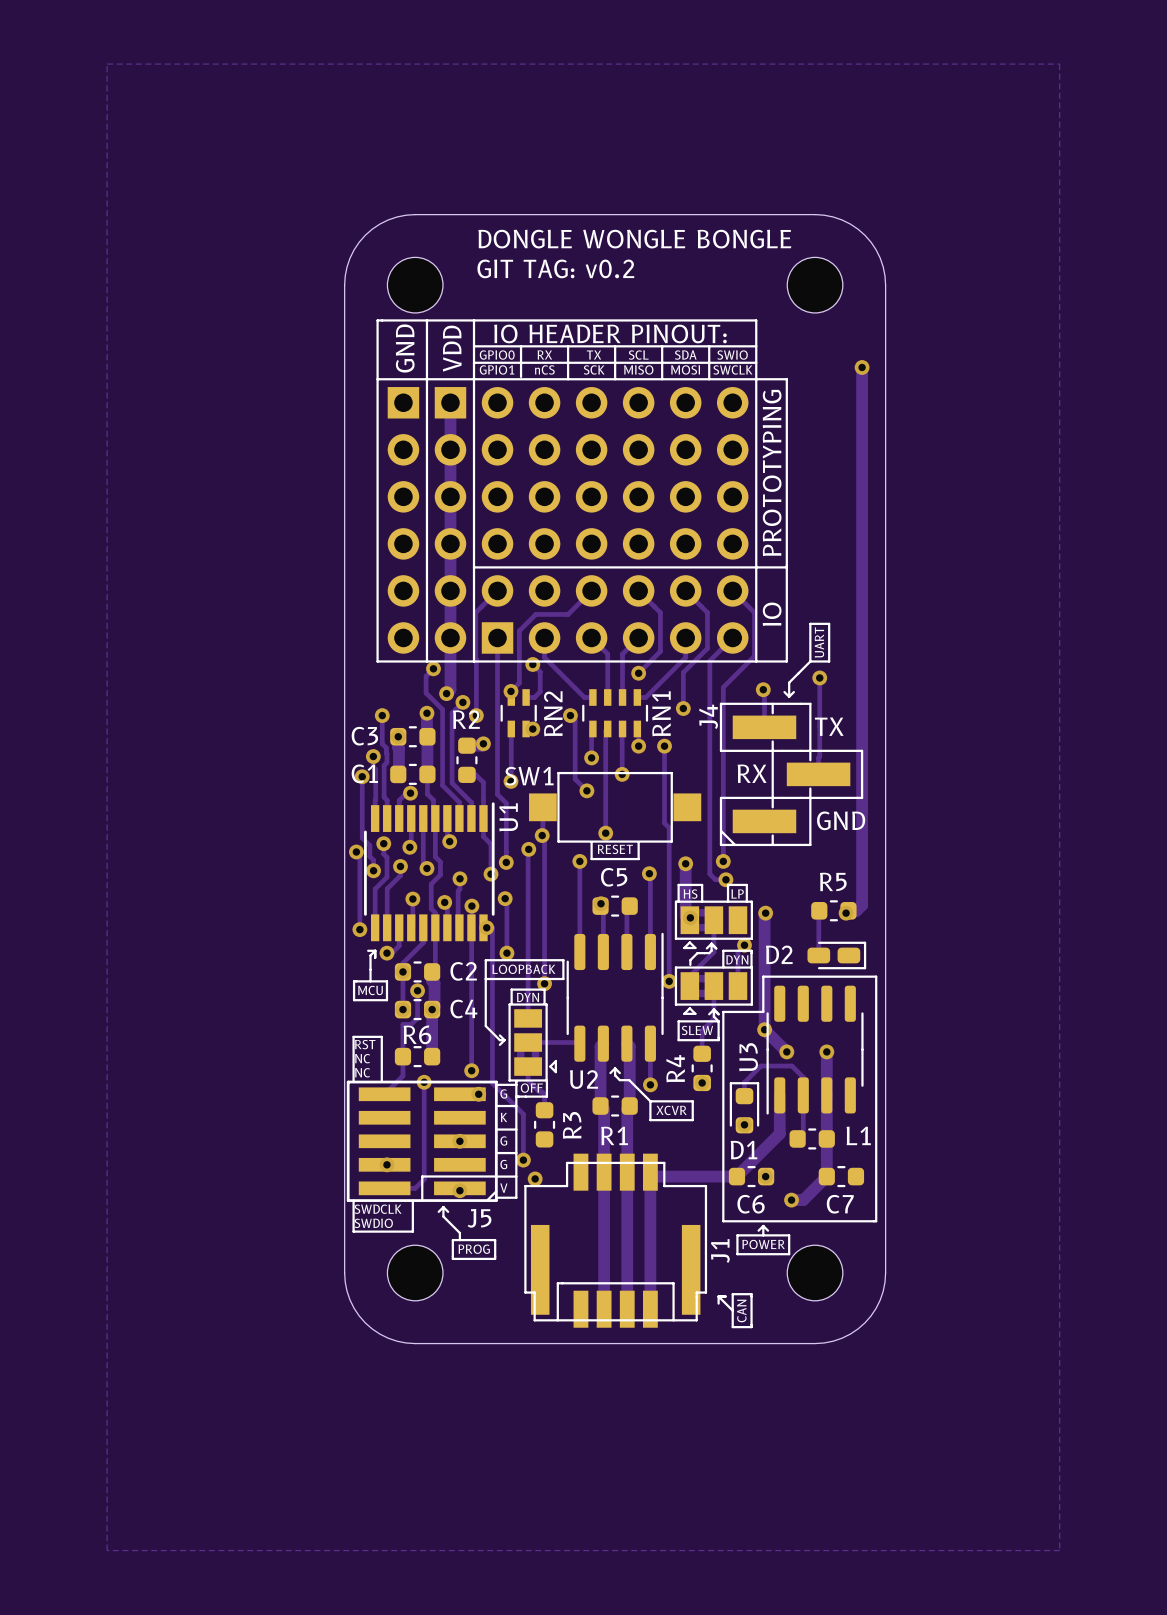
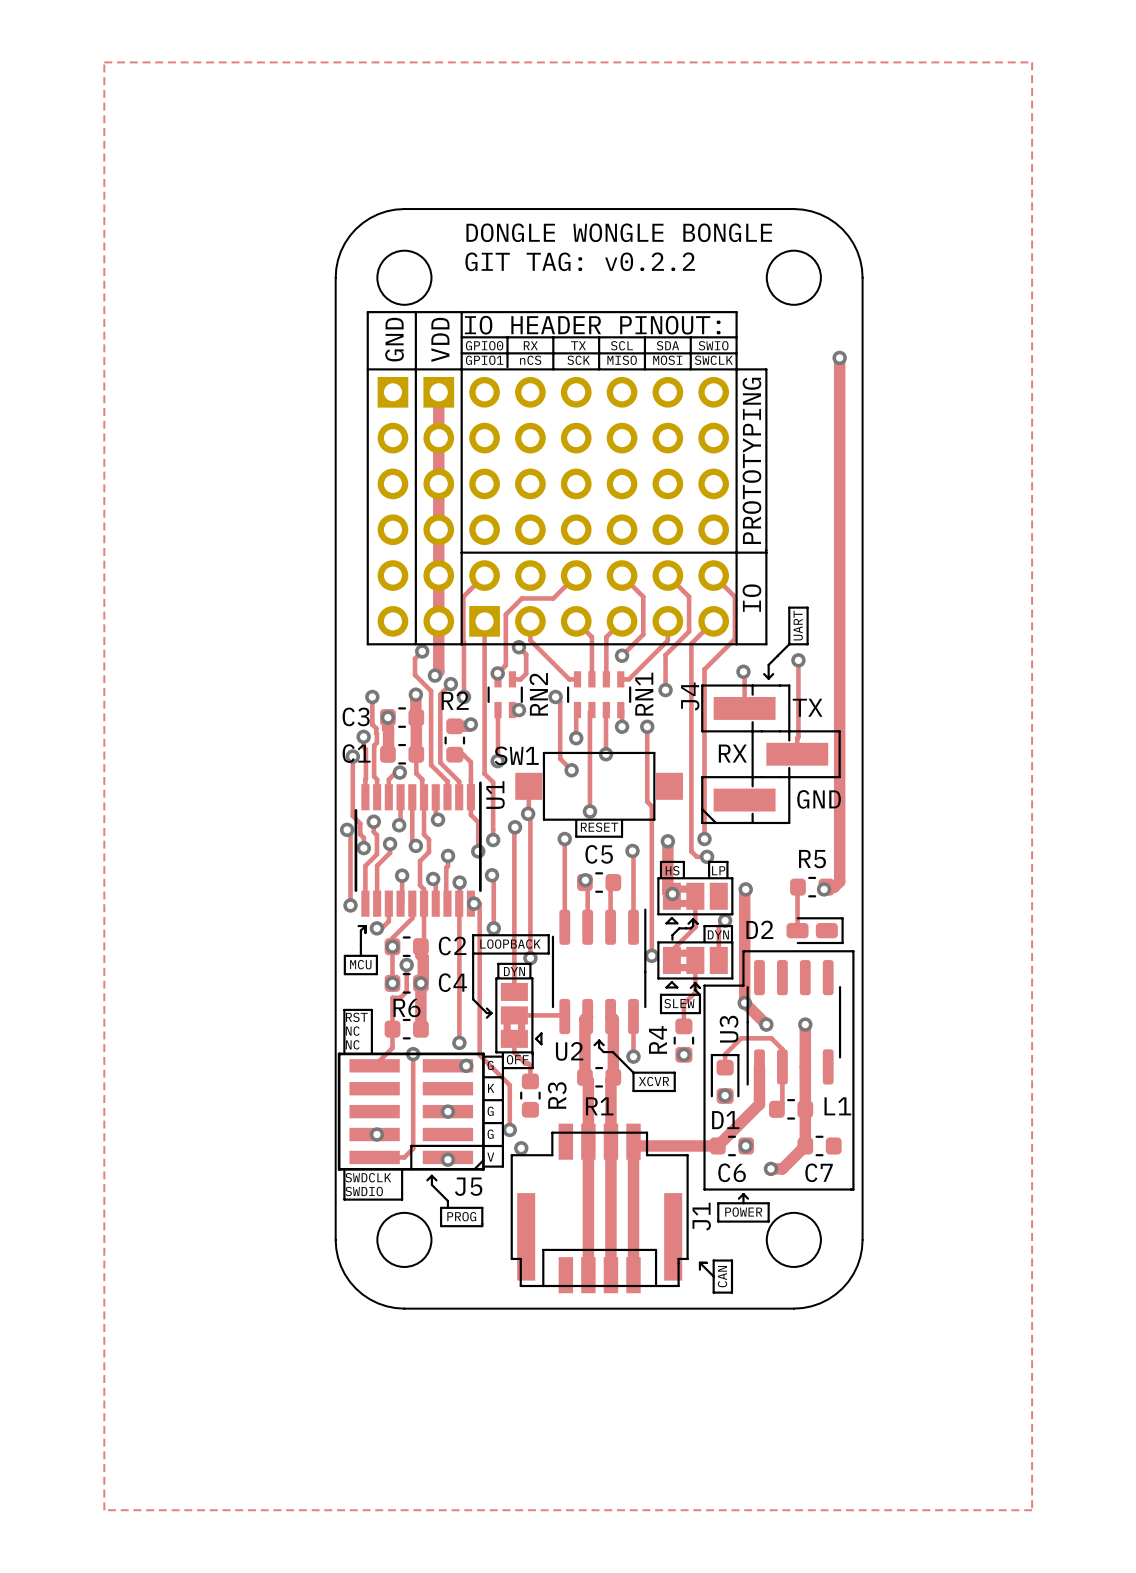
text: GIT TAG: v0.2 (555, 268) -> GIT TAG: v0.2.2 (580, 261)

